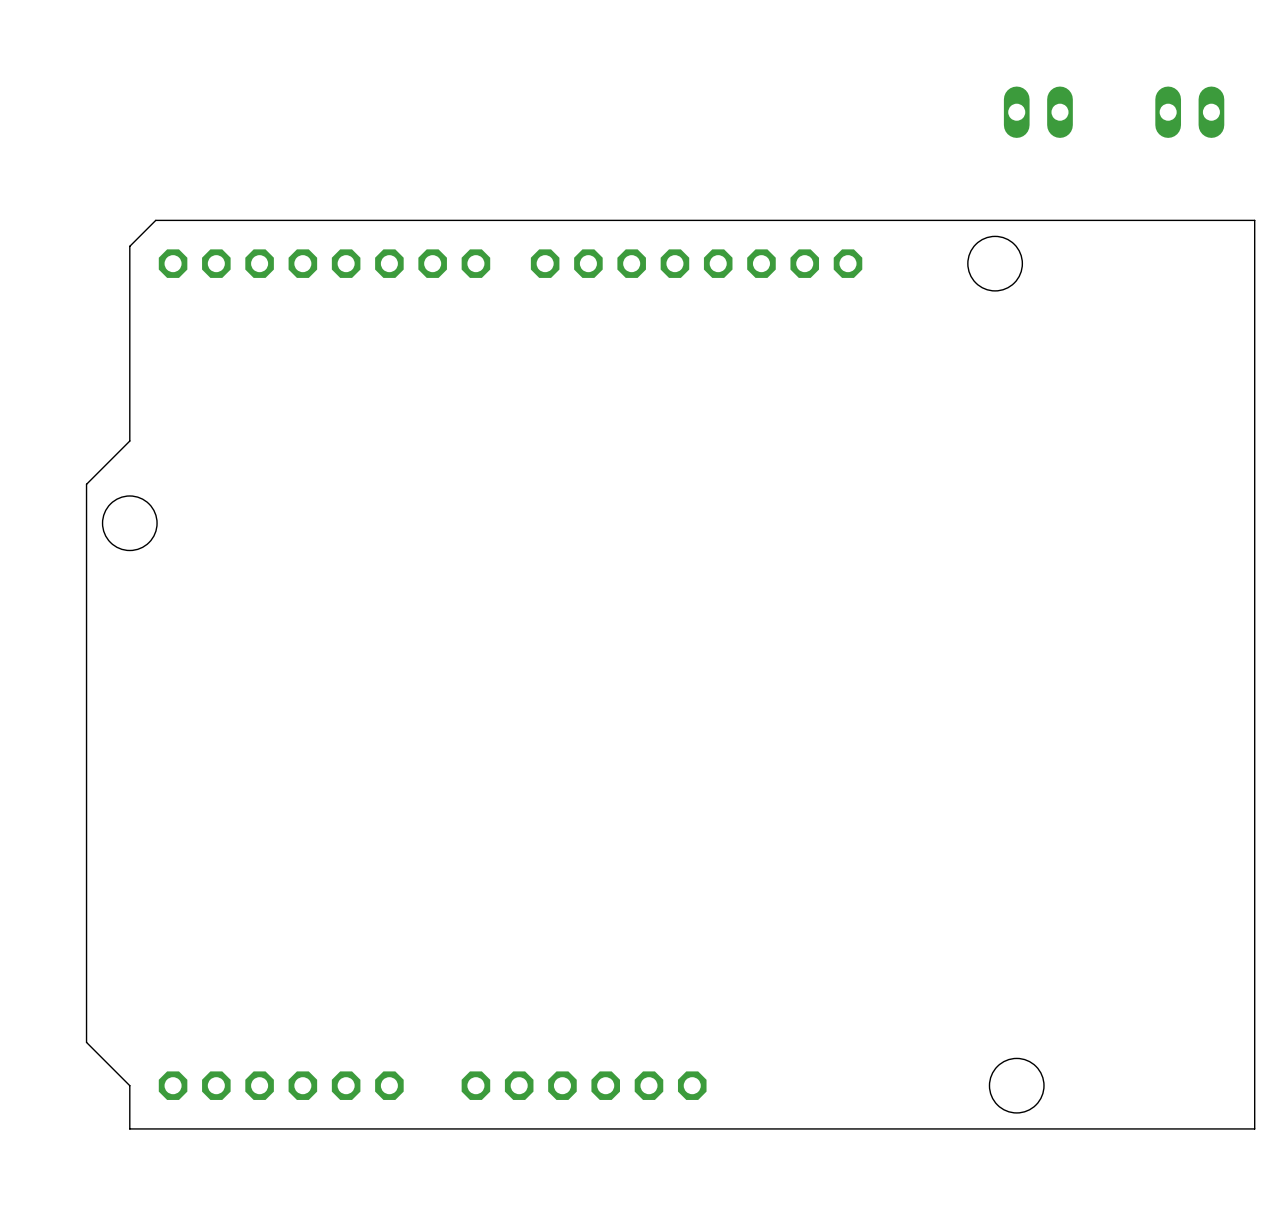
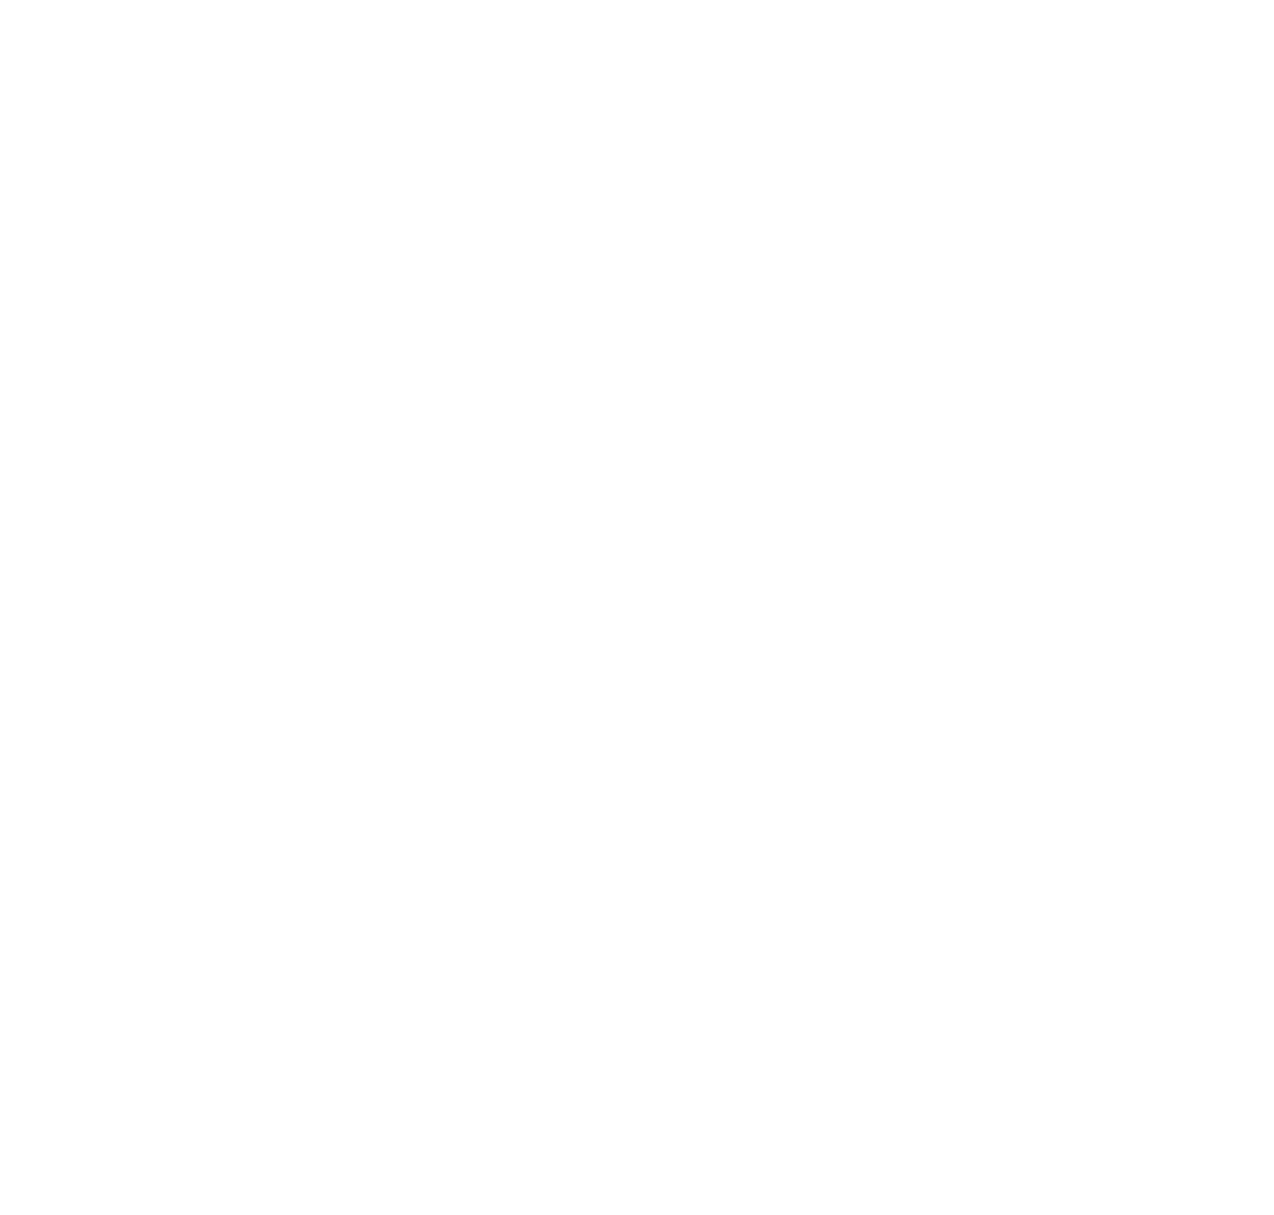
part: (1038, 112) -> none
part: (1189, 112) -> none
part: (670, 674) -> none

